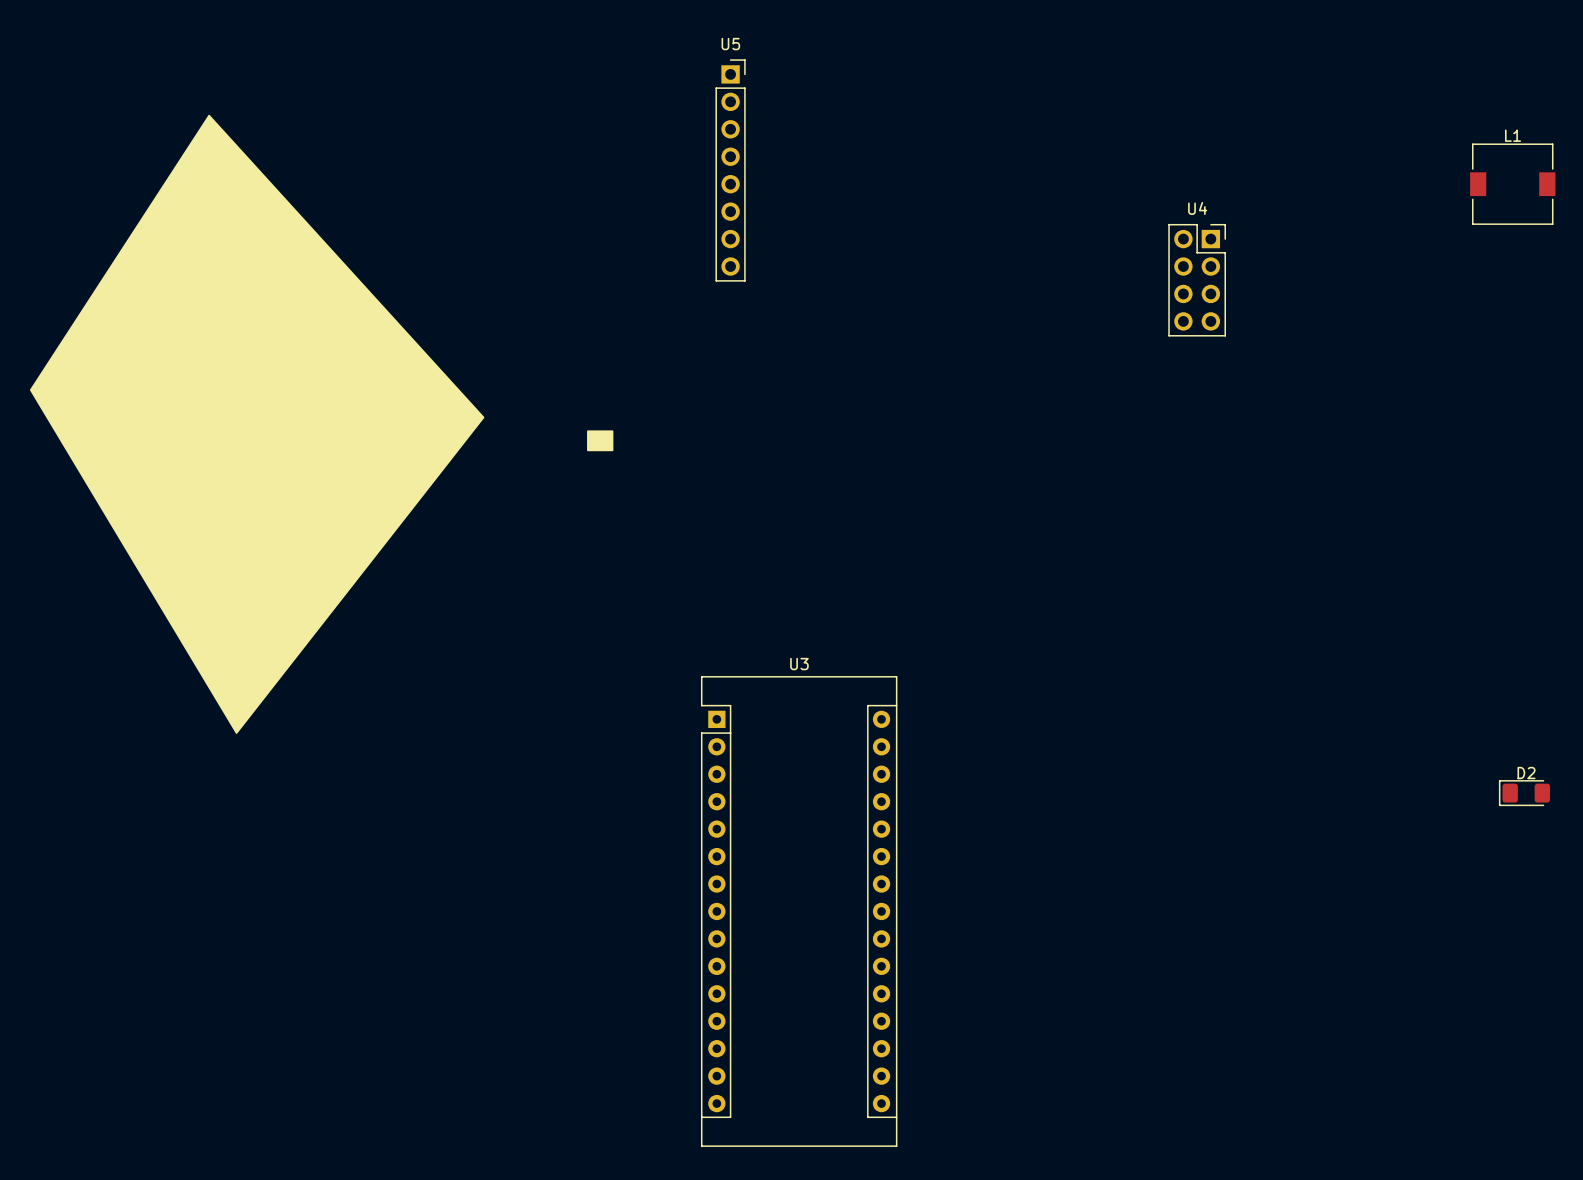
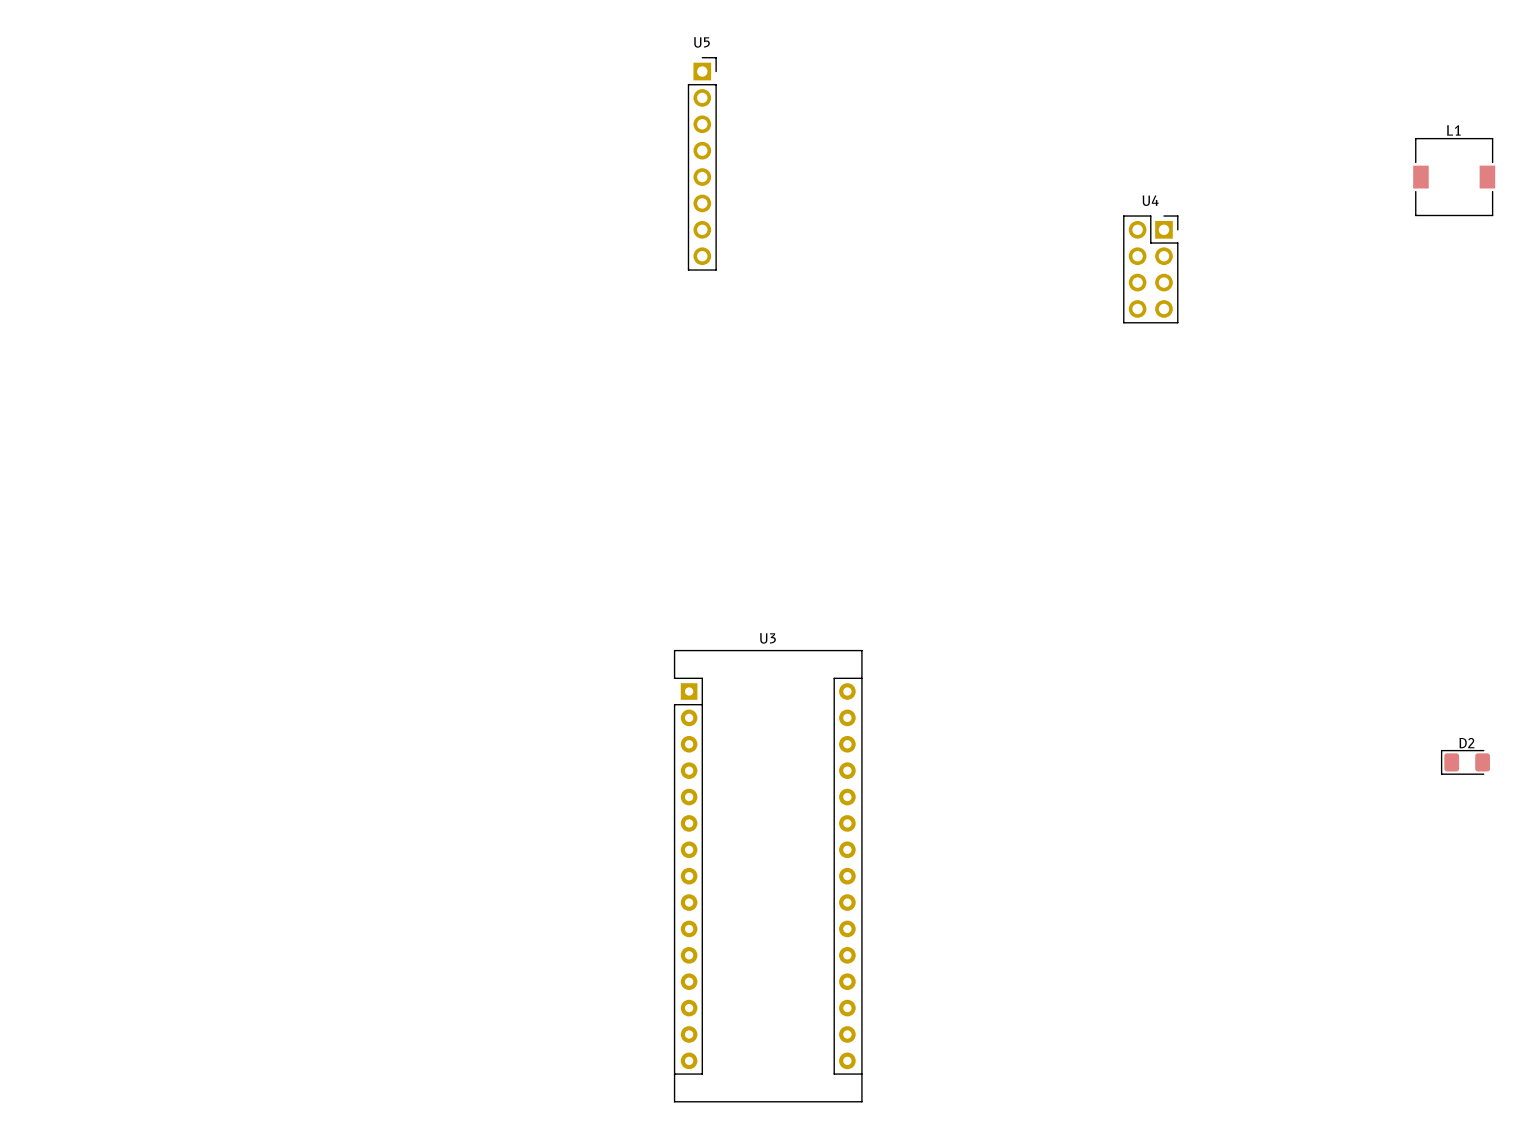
drawing: [29, 114, 485, 734] -> none
drawing: [587, 430, 614, 452] -> none

